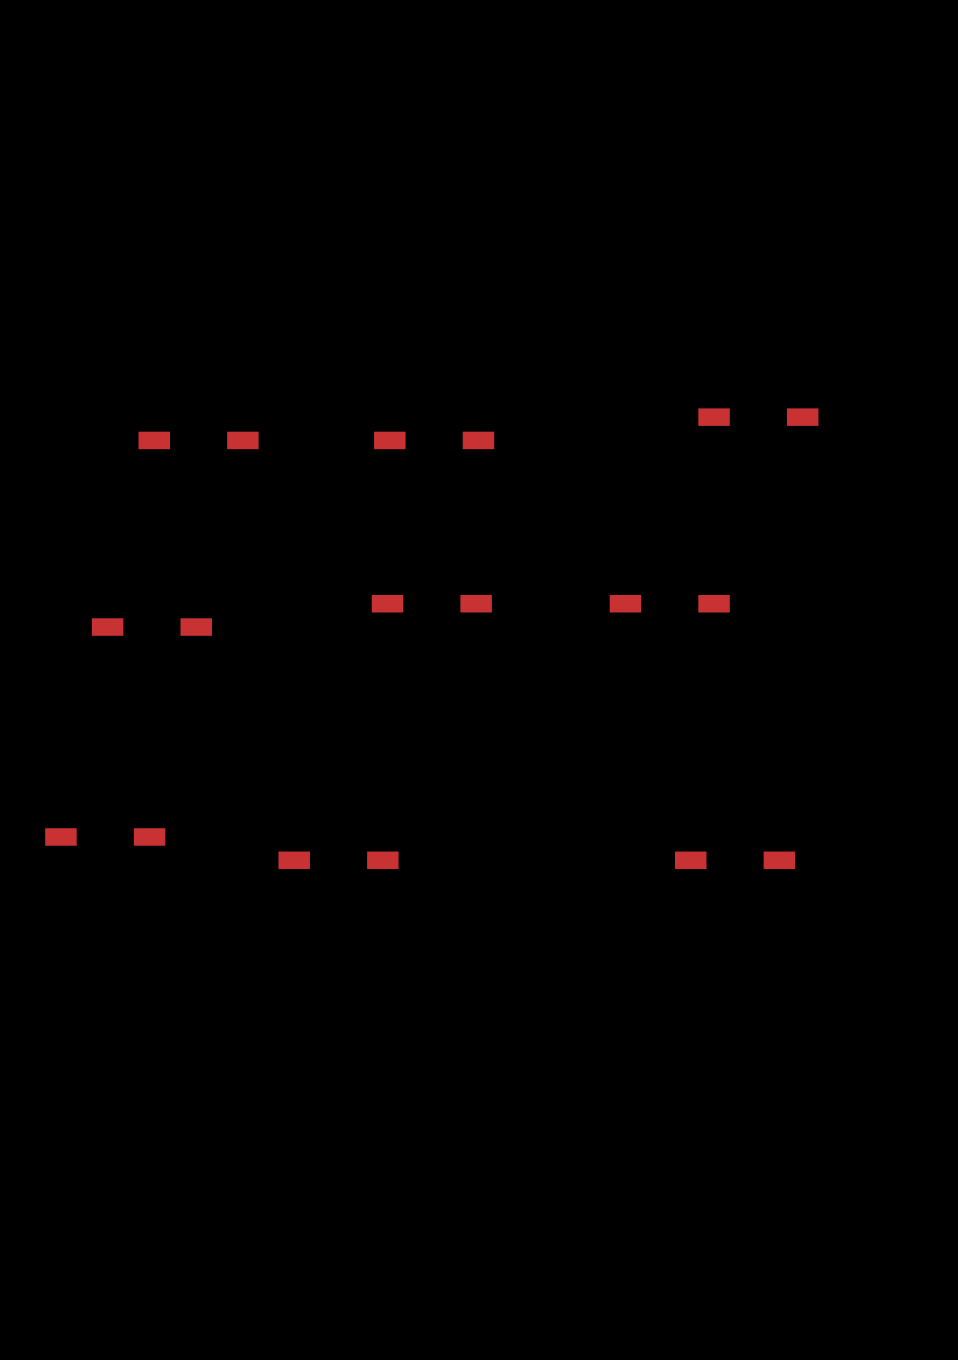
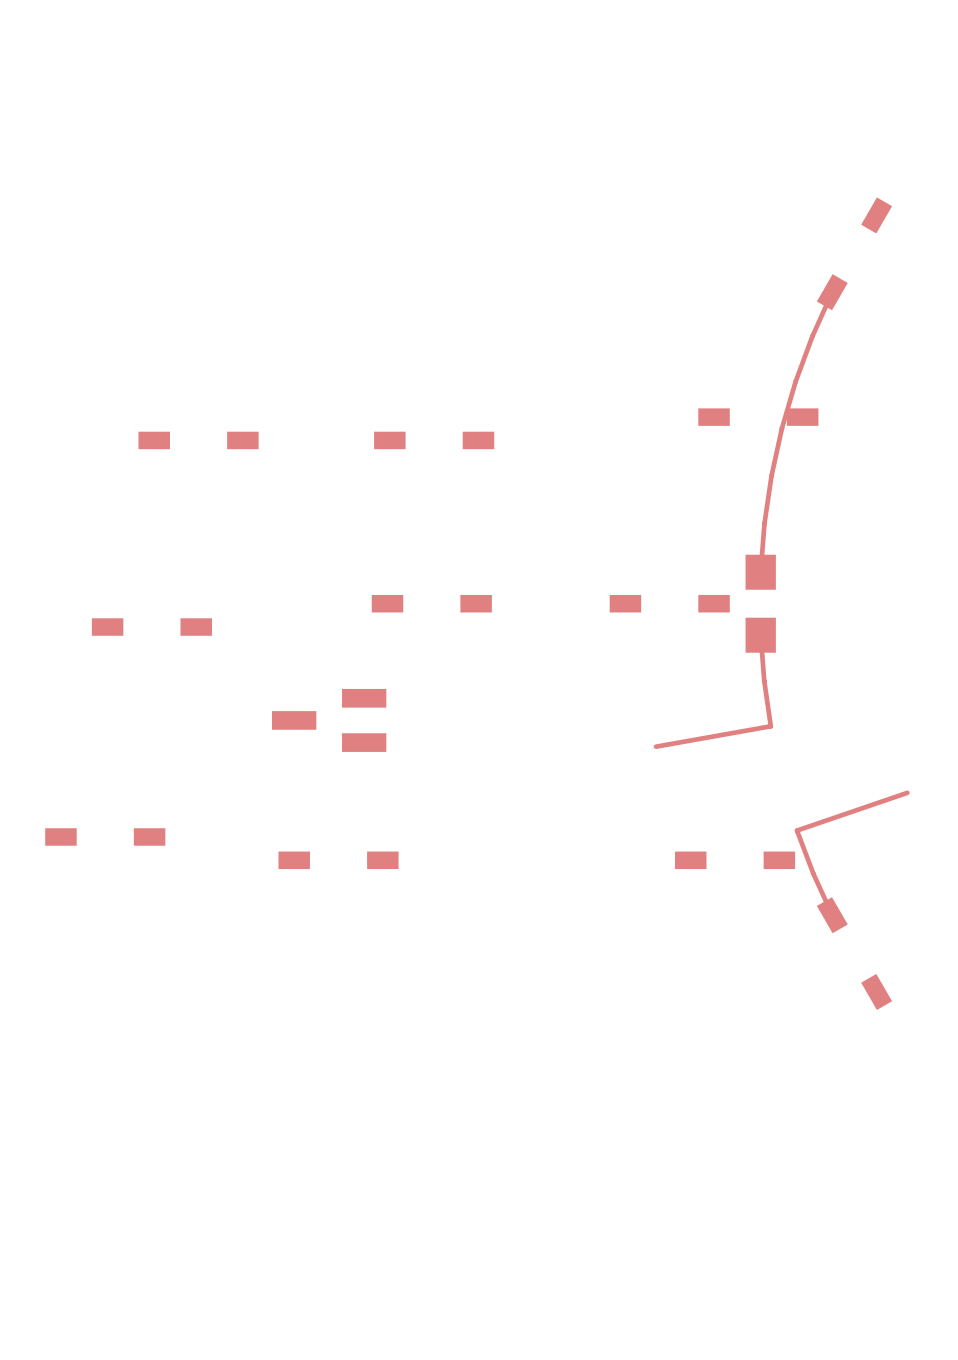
part: none -> (854, 253)
top track: none -> (832, 292) (812, 336) (795, 381) (781, 428) (771, 475) (764, 523) (760, 572)
part: none -> (760, 603)
top track: none -> (760, 635) (770, 726) (655, 746)
part: none -> (329, 720)
top track: none -> (907, 792) (797, 830) (813, 873) (832, 915)
part: none -> (854, 953)

